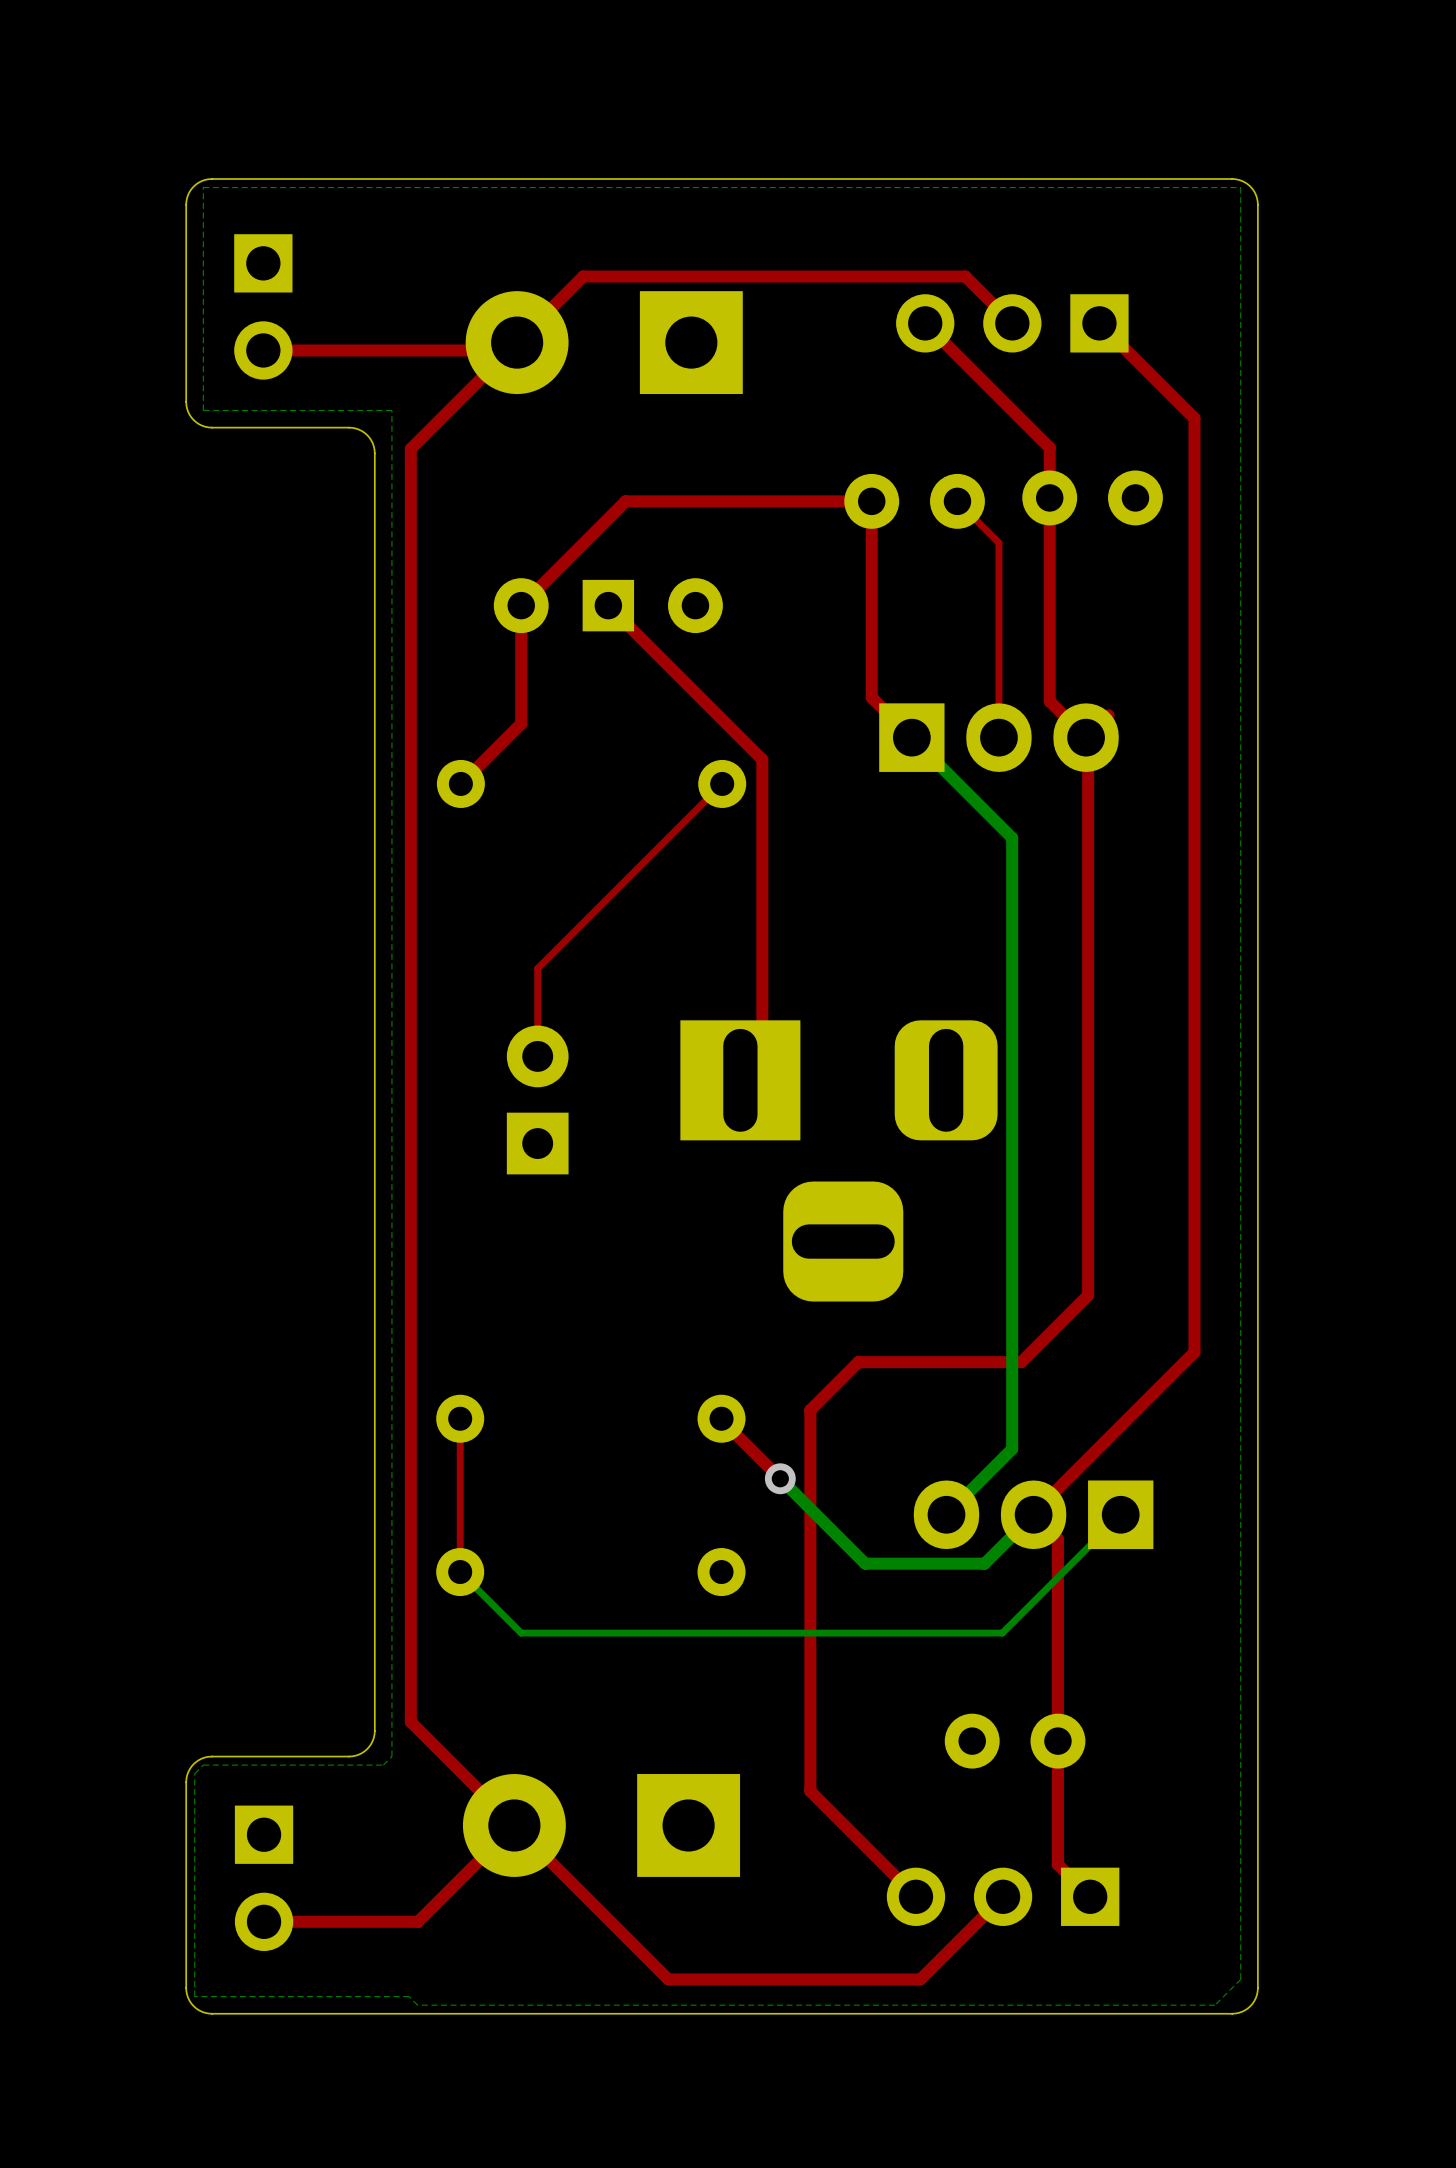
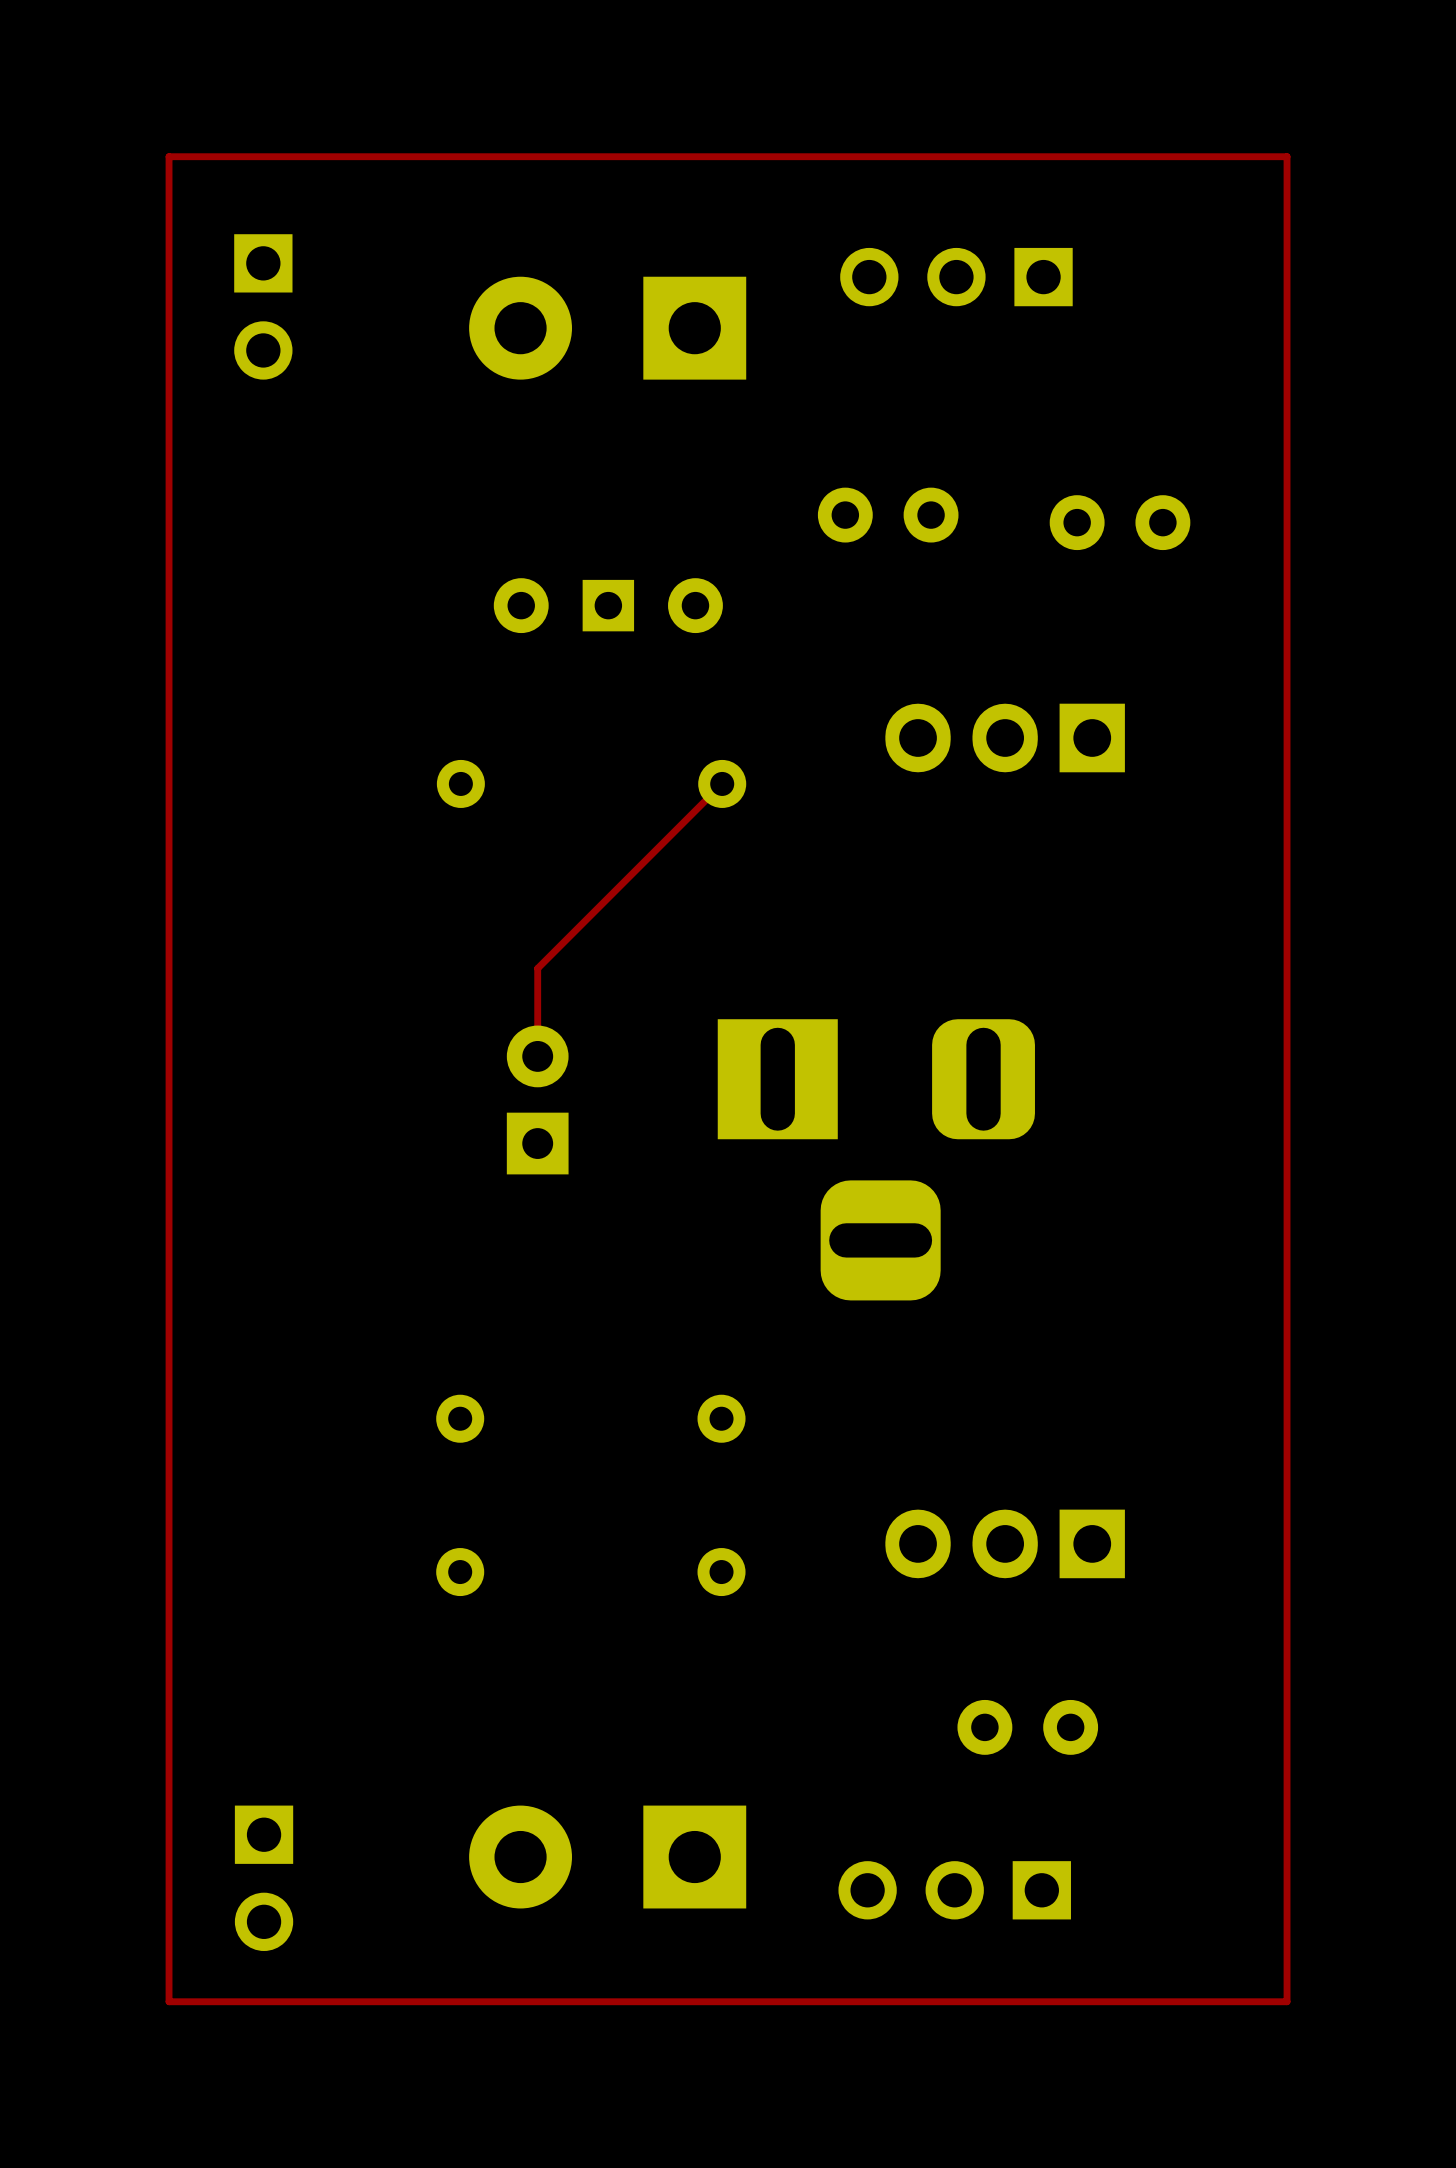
top track: none -> (1287, 156) (169, 156) (169, 2001) (1287, 2001) (1287, 156)
board edge: (1232, 178) (211, 178) (199, 182) (189, 191) (186, 204) (186, 401) (191, 417) (199, 424) (211, 427) (352, 427) (367, 435) (372, 443) (374, 453) (374, 1734) (367, 1749) (352, 1756) (208, 1756) (199, 1759) (189, 1769) (186, 1782) (186, 1988) (189, 2000) (199, 2010) (211, 2013) (1232, 2013) (1245, 2010) (1254, 2000) (1257, 1988) (1257, 204) (1255, 194) (1250, 186) (1242, 180) (1232, 178) -> none
bottom zone outline: (1240, 187) (1240, 1979) (1215, 2005) (417, 2005) (409, 1996) (194, 1996) (194, 1773) (203, 1765) (383, 1765) (391, 1756) (391, 410) (203, 410) (203, 187) (1240, 187) -> none
top track: (925, 323) (1049, 447) (1049, 701) (1088, 739) (1088, 1295) (1021, 1362) (858, 1362) (810, 1410) (810, 1791) (915, 1896) -> none
top track: (1012, 323) (965, 276) (583, 276) (410, 448) (410, 1721) (668, 1979) (920, 1979) (1003, 1896) -> none
part position: (1012, 323) -> (956, 277)
top track: (1099, 323) (1194, 418) (1194, 1352) (1033, 1513) (1057, 1539) (1057, 1864) (1090, 1896) -> none
part position: (604, 342) -> (607, 328)
top track: (509, 350) (263, 350) -> none
part position: (1092, 497) -> (1120, 522)
part position: (914, 501) -> (888, 515)
top track: (957, 501) (998, 542) (998, 737) -> none
top track: (608, 605) (762, 759) (762, 1058) (740, 1080) -> none
top track: (911, 737) (871, 697) (871, 501) (625, 501) (521, 605) (521, 723) (460, 783) -> none
bottom track: (911, 737) (1012, 838) (1012, 1449) (946, 1514) -> none
part rotation: 0° (998, 737) -> 180° (1005, 737)
part position: (838, 1160) -> (876, 1159)
top track: (460, 1418) (460, 1572) -> none
top track: (721, 1418) (780, 1478) -> none
bottom track: (780, 1478) (865, 1563) (984, 1563) (1033, 1514) -> none
via: (780, 1478) -> none
part position: (1033, 1514) -> (1005, 1543)
bottom track: (1120, 1514) (1002, 1633) (521, 1633) (460, 1572) -> none
part position: (1015, 1741) -> (1027, 1727)
top track: (514, 1825) (418, 1921) (264, 1921) -> none
part position: (601, 1825) -> (607, 1857)
part position: (1003, 1896) -> (954, 1890)

